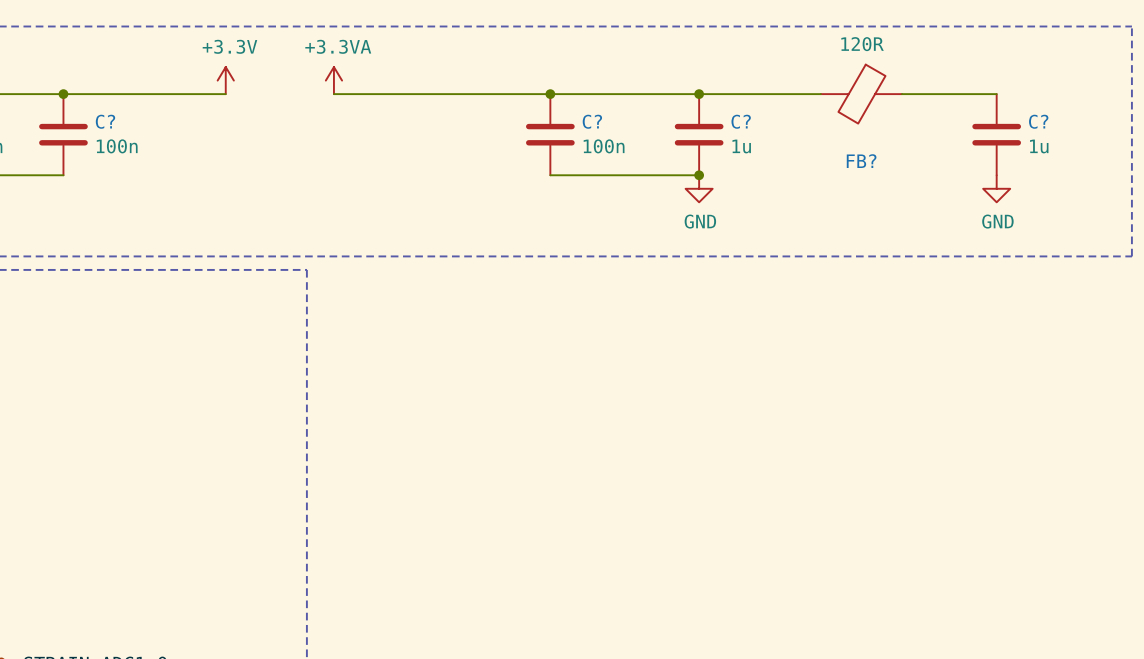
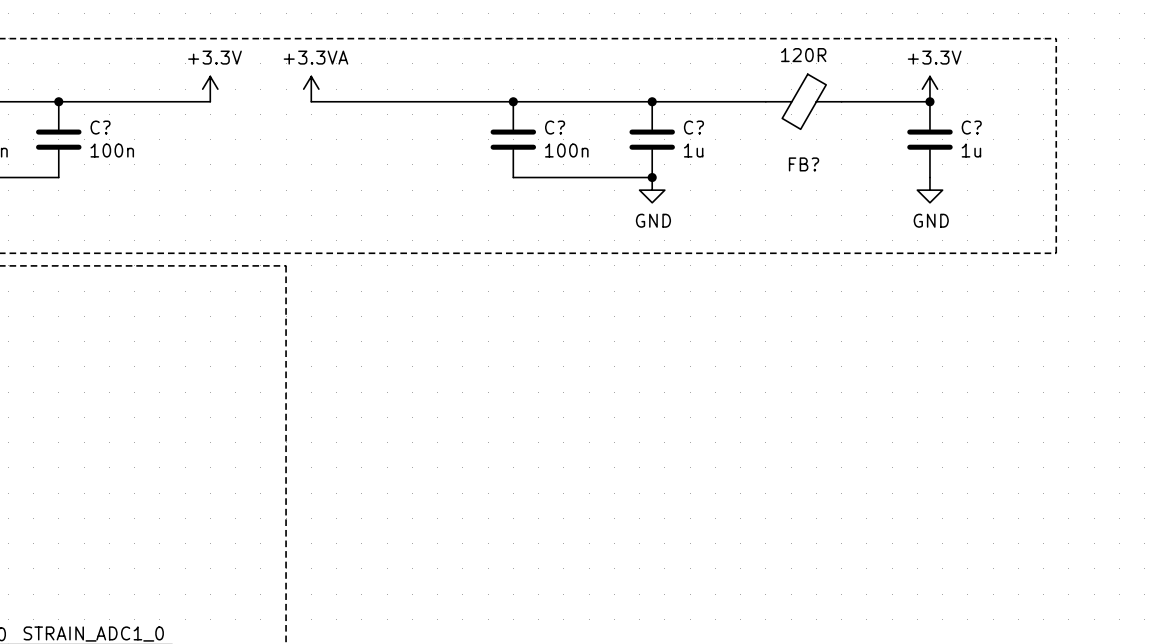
power symbol: none -> +3.3V (929, 89)
junction: none -> (929, 101)

